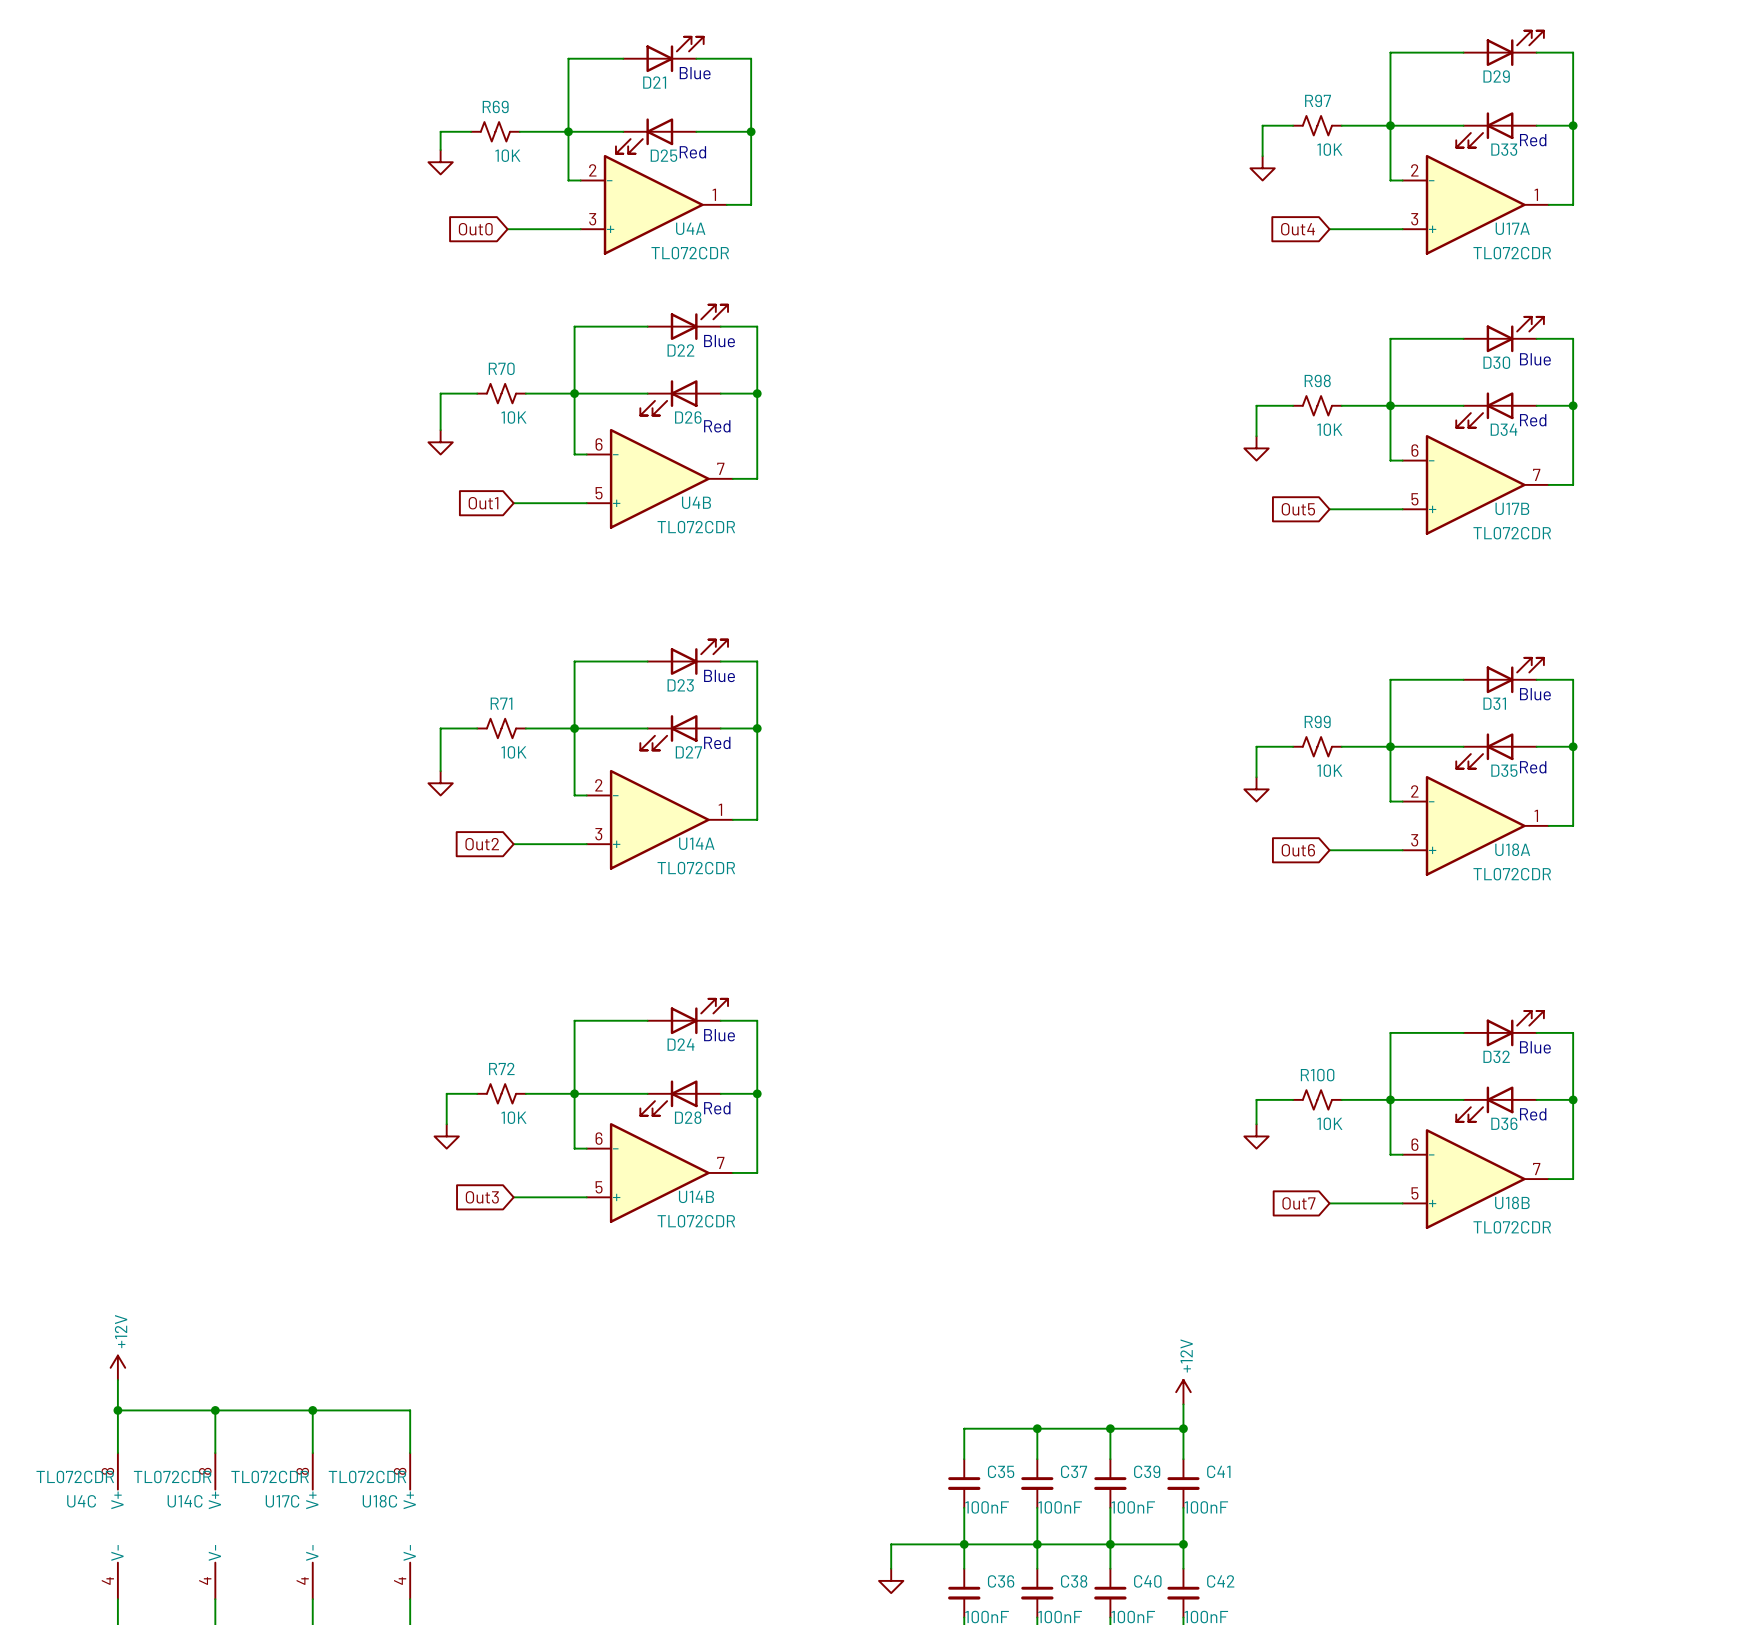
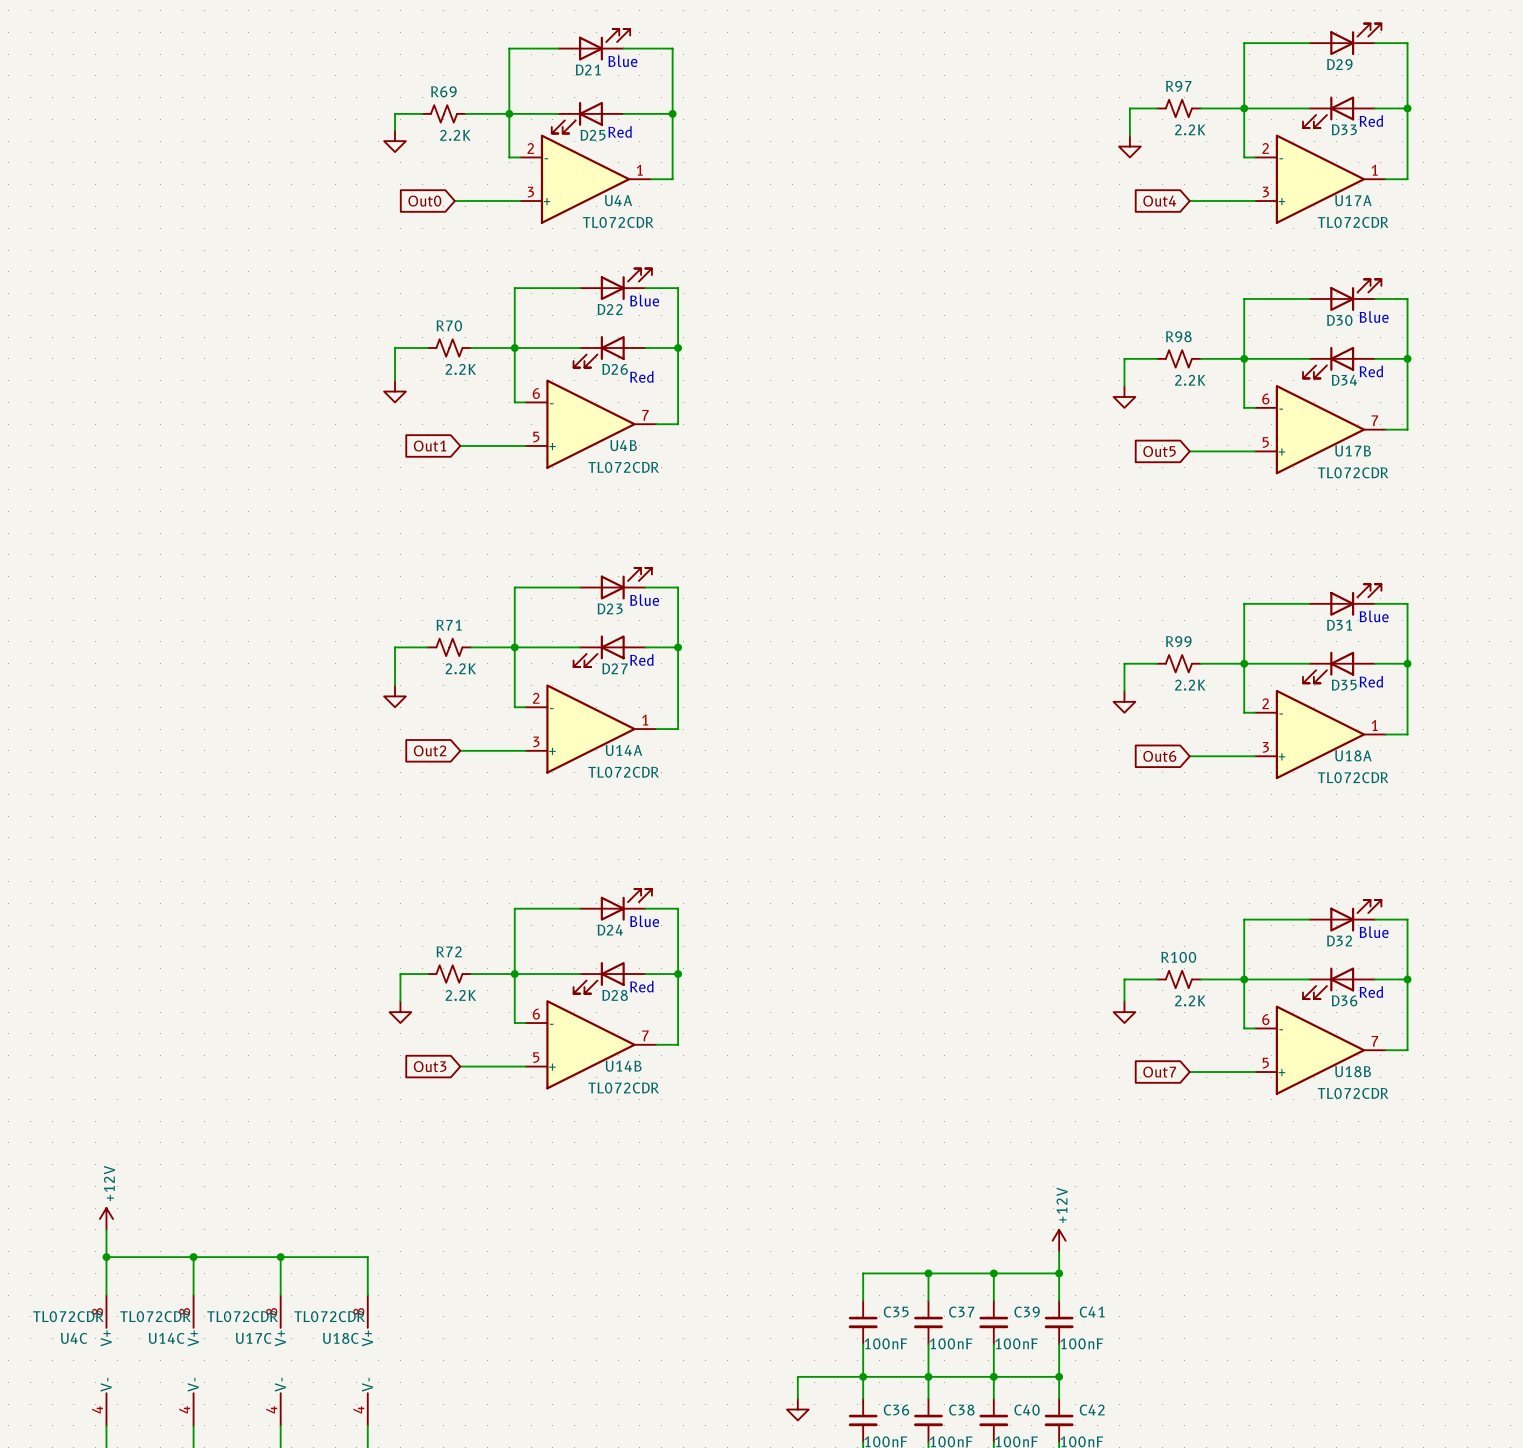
R97 value: 10K (1329, 149) -> 2.2K (1190, 129)
R69 value: 10K (507, 155) -> 2.2K (455, 135)
R70 value: 10K (513, 417) -> 2.2K (460, 369)
R98 value: 10K (1329, 429) -> 2.2K (1190, 380)
R71 value: 10K (513, 752) -> 2.2K (460, 668)
R99 value: 10K (1329, 770) -> 2.2K (1190, 685)
R72 value: 10K (513, 1117) -> 2.2K (460, 995)
R100 value: 10K (1329, 1123) -> 2.2K (1190, 1000)

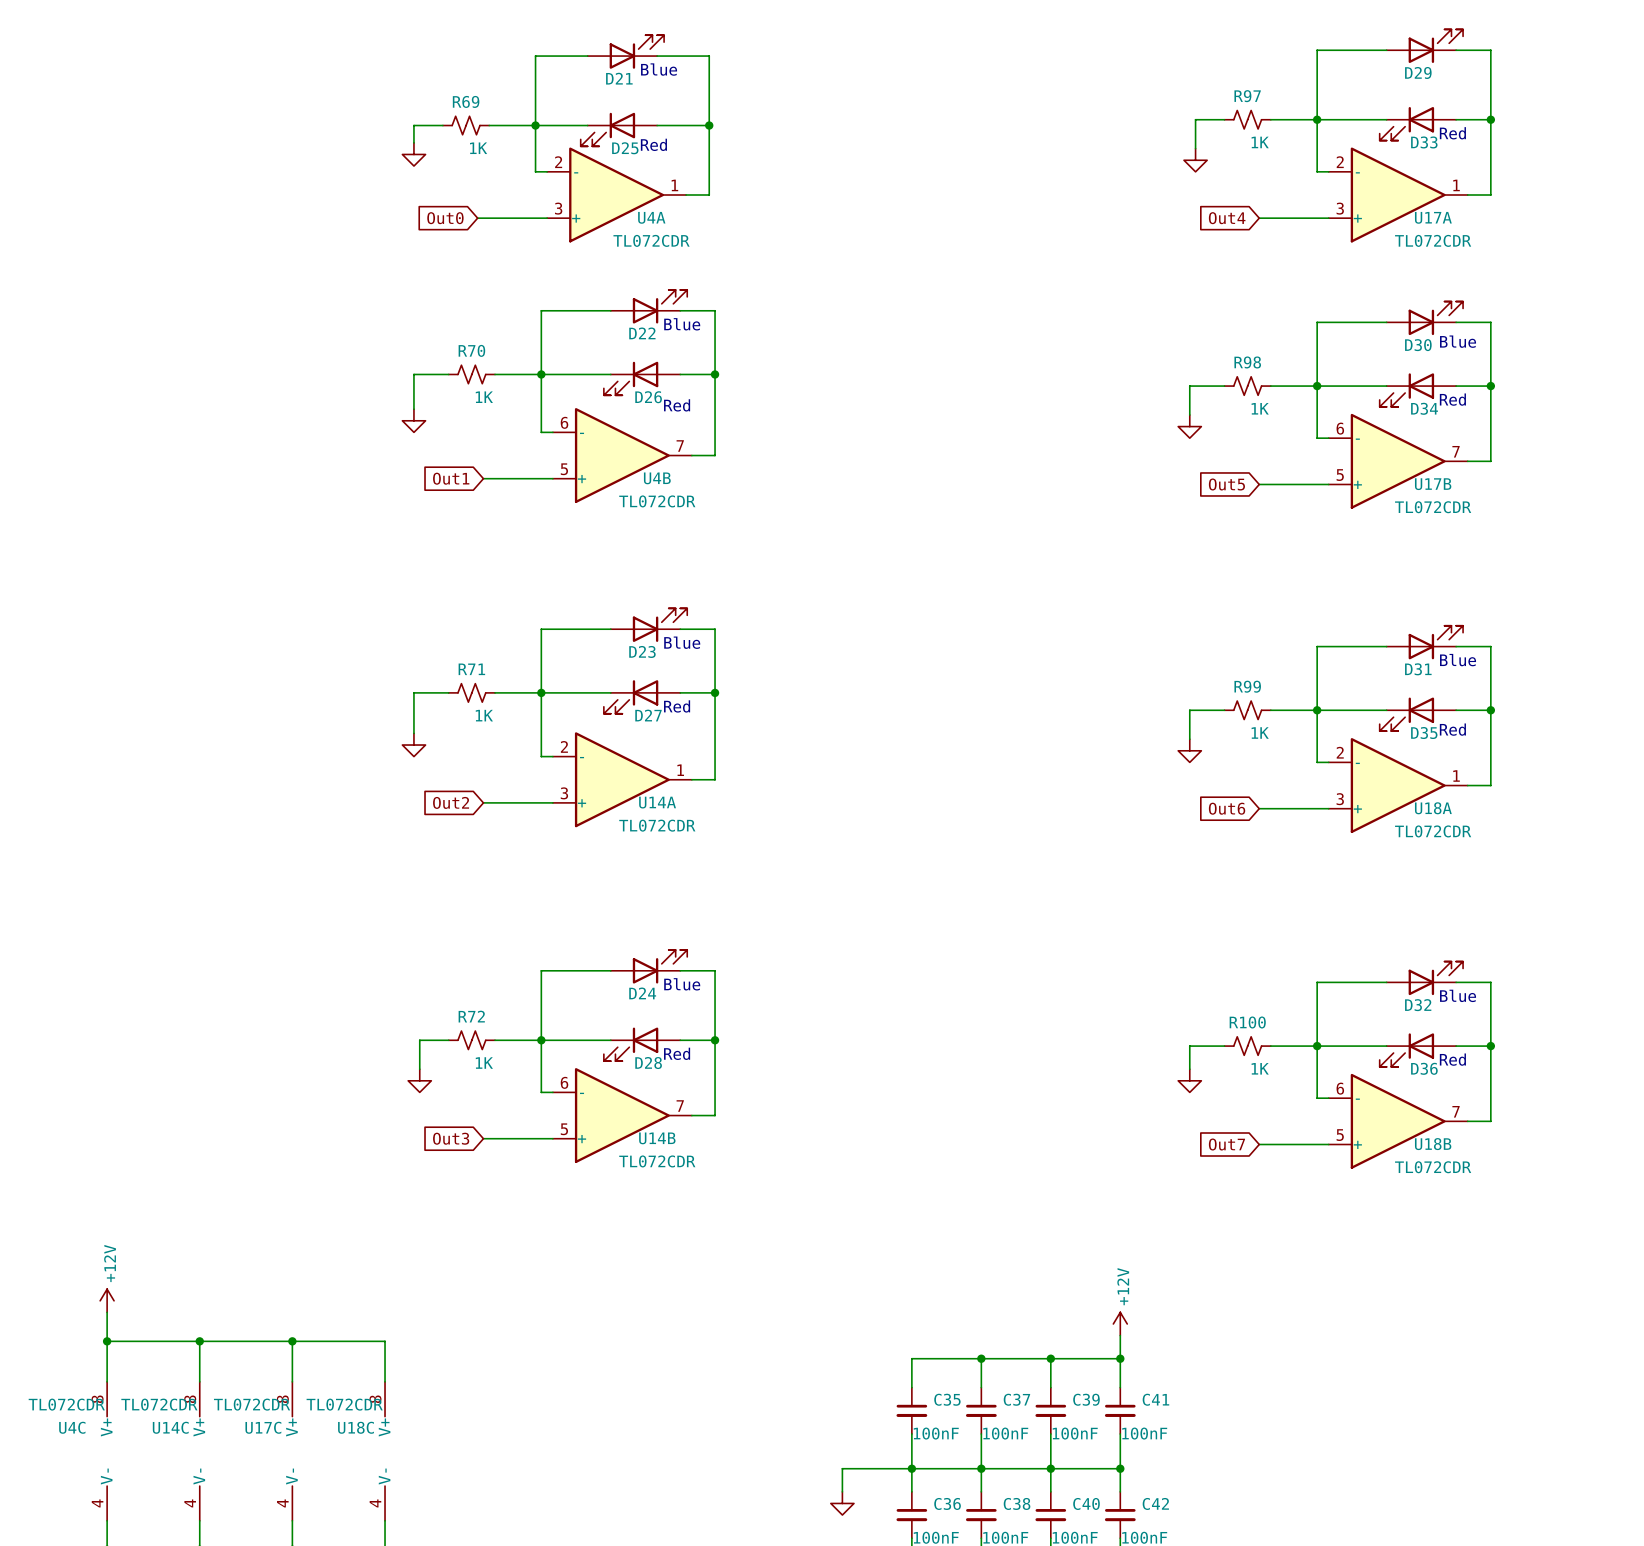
R97 value: 2.2K (1190, 129) -> 1K (1260, 142)
R69 value: 2.2K (455, 135) -> 1K (478, 148)
R70 value: 2.2K (460, 369) -> 1K (484, 397)
R98 value: 2.2K (1190, 380) -> 1K (1260, 408)
R71 value: 2.2K (460, 668) -> 1K (484, 715)
R99 value: 2.2K (1190, 685) -> 1K (1260, 733)
R72 value: 2.2K (460, 995) -> 1K (484, 1063)
R100 value: 2.2K (1190, 1000) -> 1K (1260, 1068)

